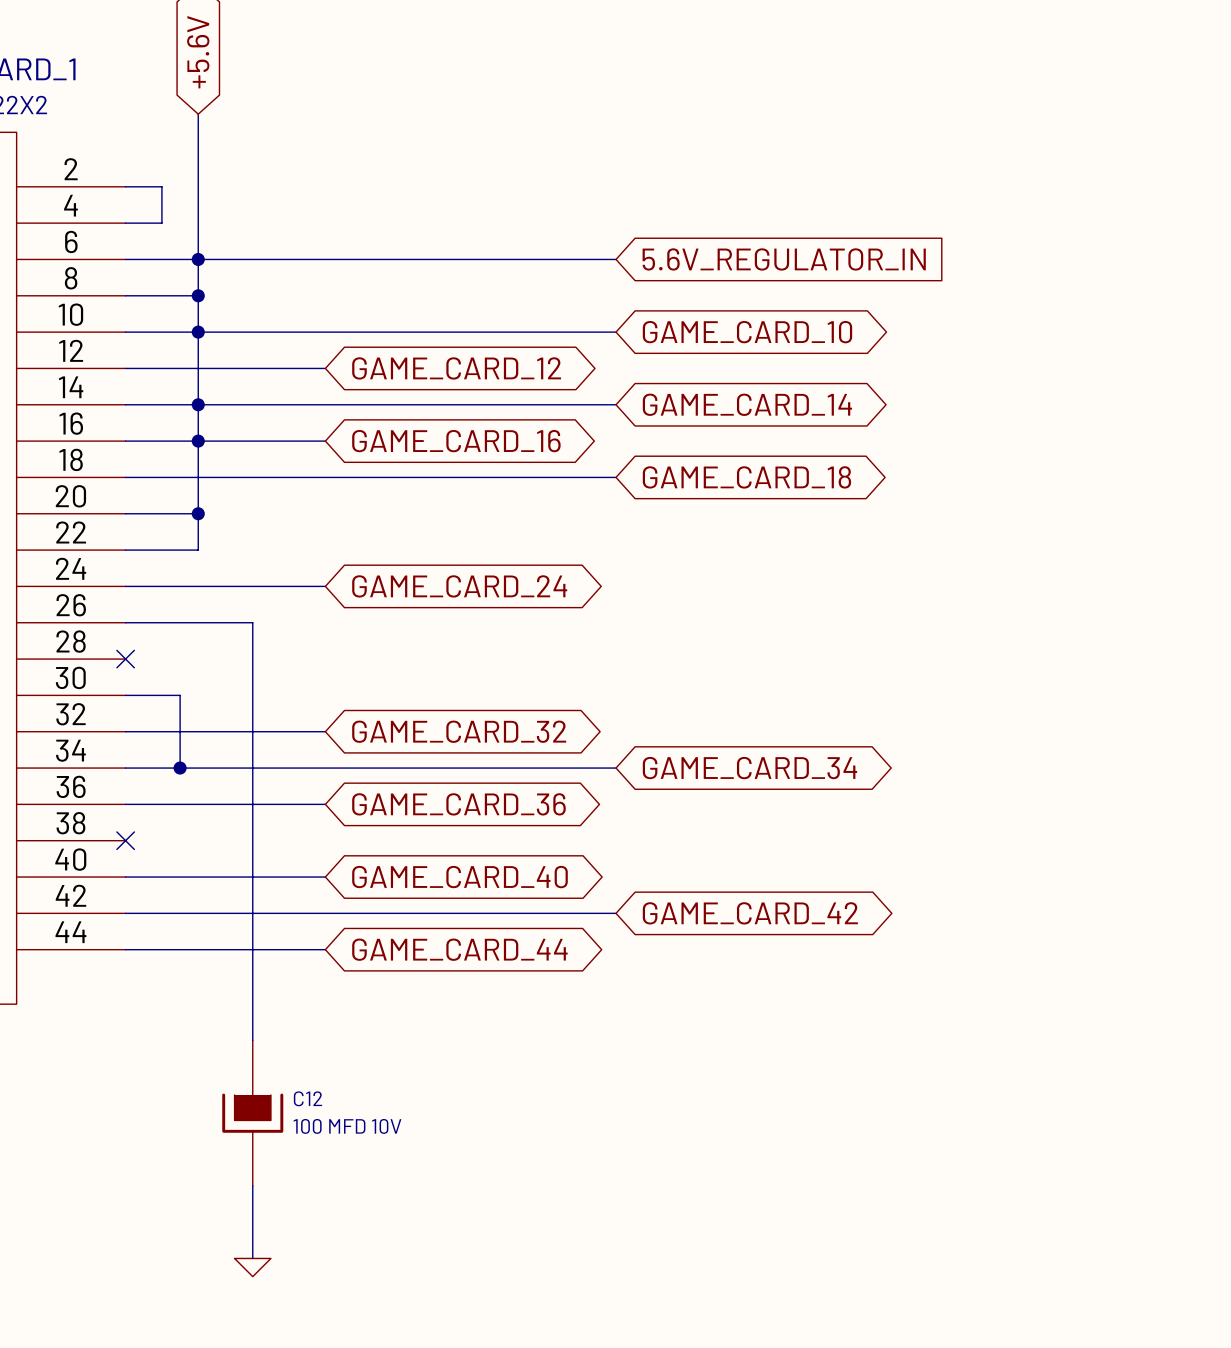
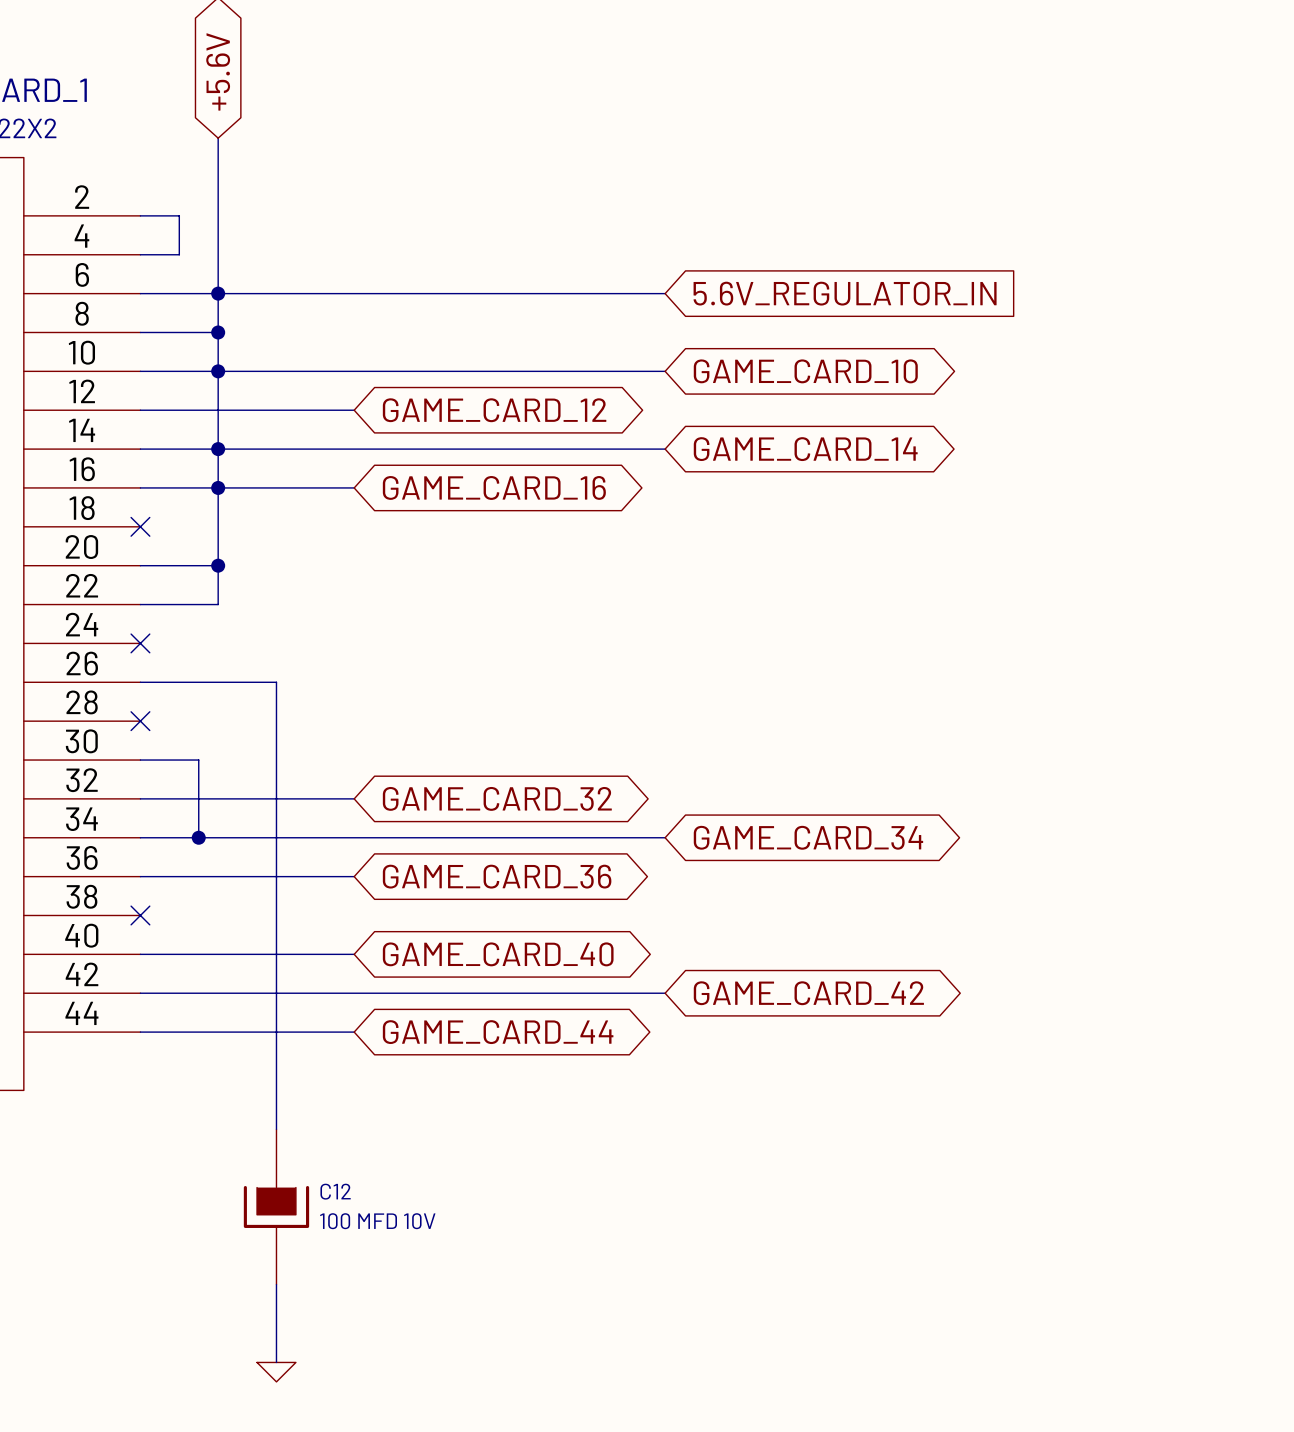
wire: (125, 477) (616, 477) -> none
no-connect mark: none -> (140, 526)
global label: GAME_CARD_18 (746, 477) -> none
wire: (125, 586) (325, 586) -> none
no-connect mark: none -> (140, 643)
global label: GAME_CARD_24 (459, 586) -> none

